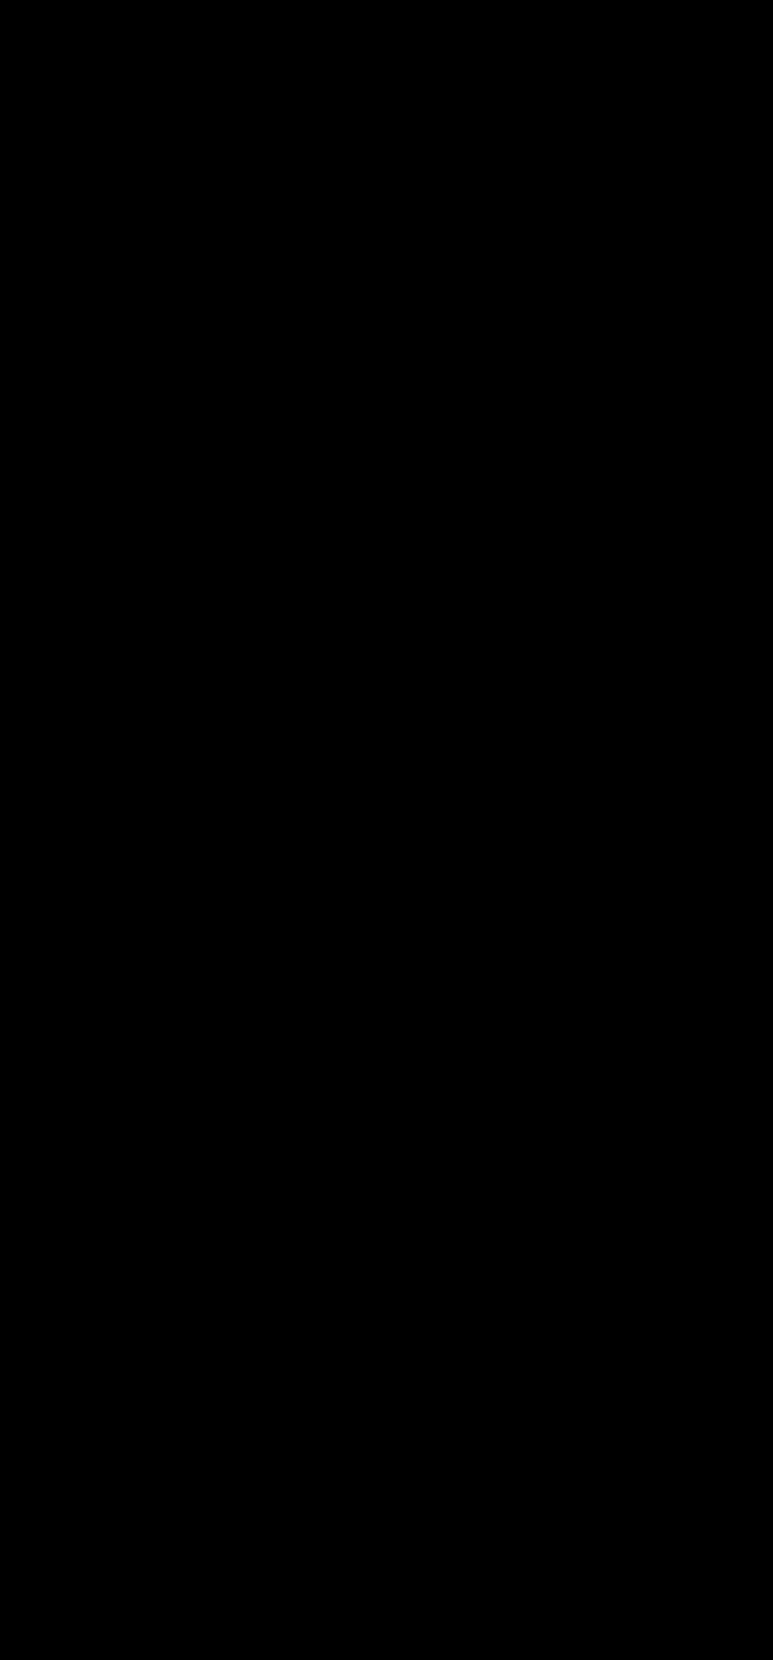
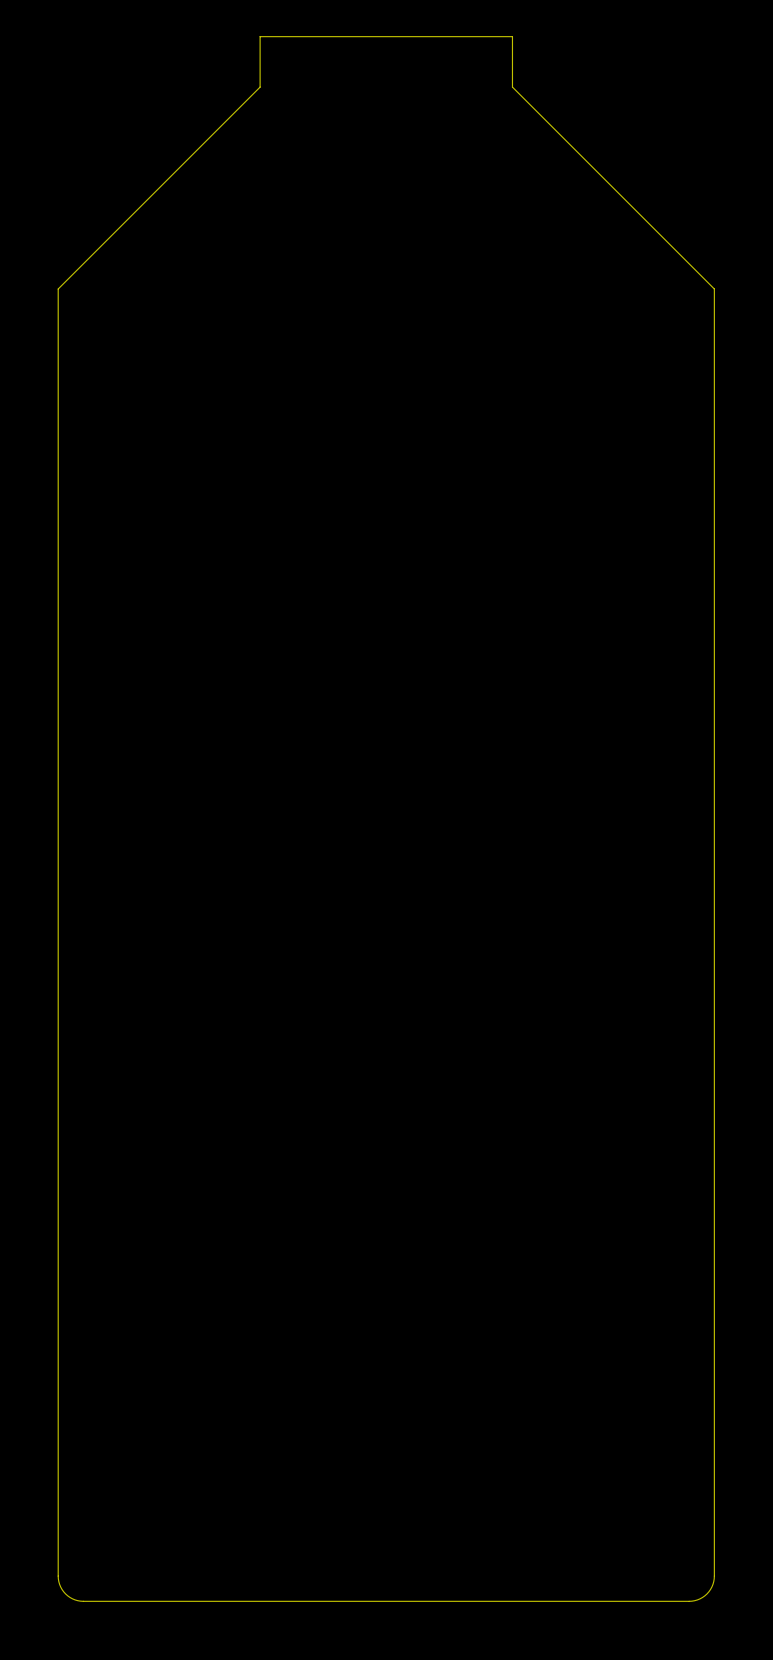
board edge: none -> (260, 36) (260, 87) (58, 289) (58, 1581) (67, 1595) (83, 1601) (694, 1600) (708, 1591) (714, 1576) (714, 289) (512, 87) (512, 36) (260, 36)

